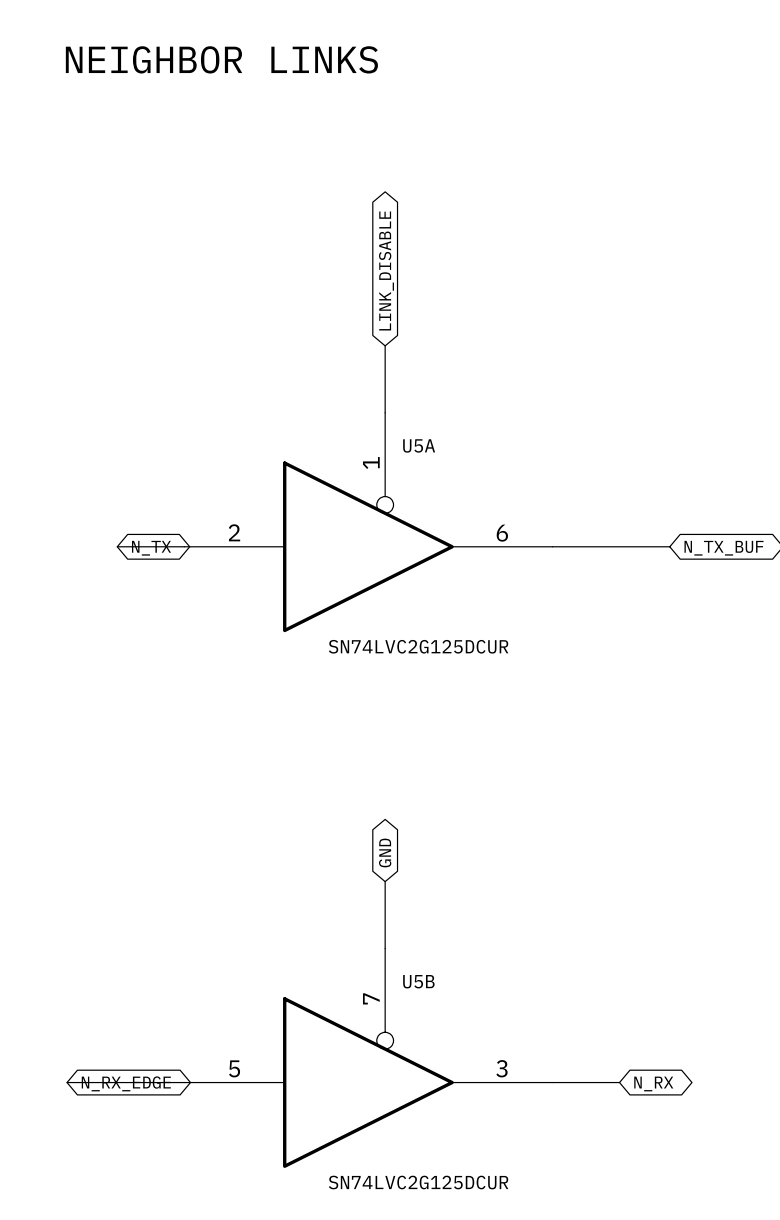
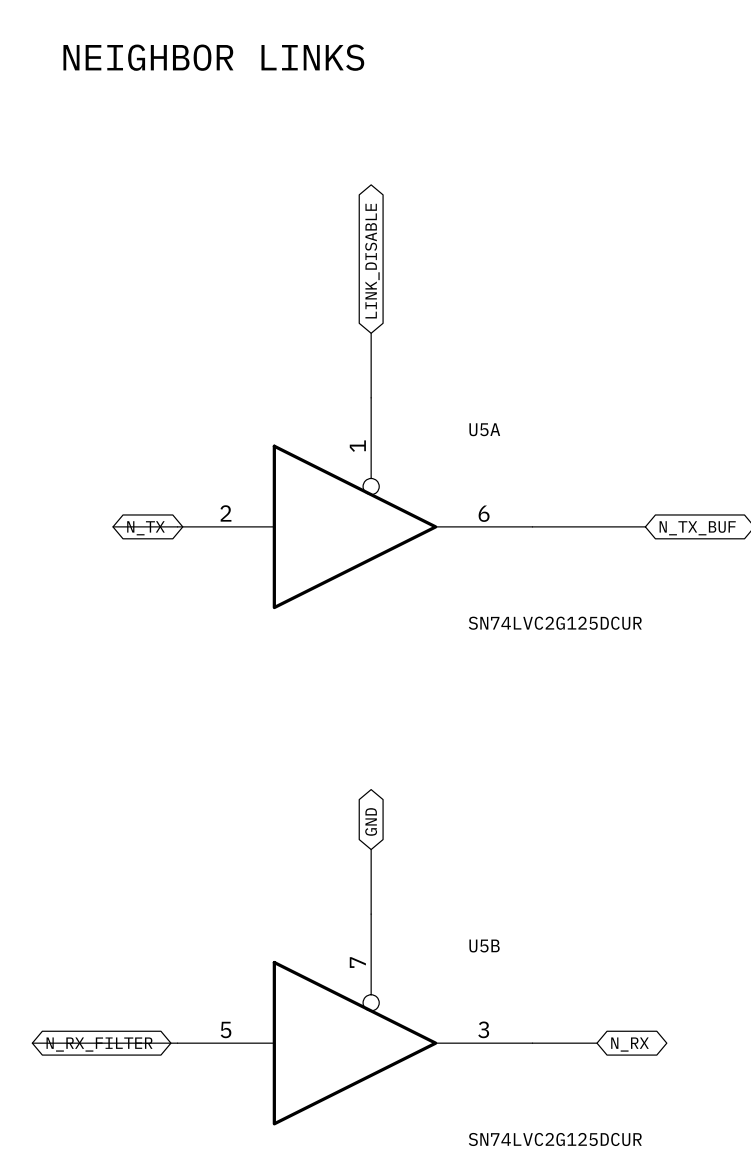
U5A name position: U5A (419, 445) -> U5A (484, 429)
U5A value position: SN74LVC2G125DCUR (418, 646) -> SN74LVC2G125DCUR (555, 623)
U5B name position: U5B (418, 981) -> U5B (484, 946)
wire: none -> (32, 1043) (64, 1043)
global label: none -> N_RX_FILTER (99, 1044)
global label: N_RX_EDGE (126, 1083) -> none
U5B value position: SN74LVC2G125DCUR (418, 1182) -> SN74LVC2G125DCUR (555, 1139)

